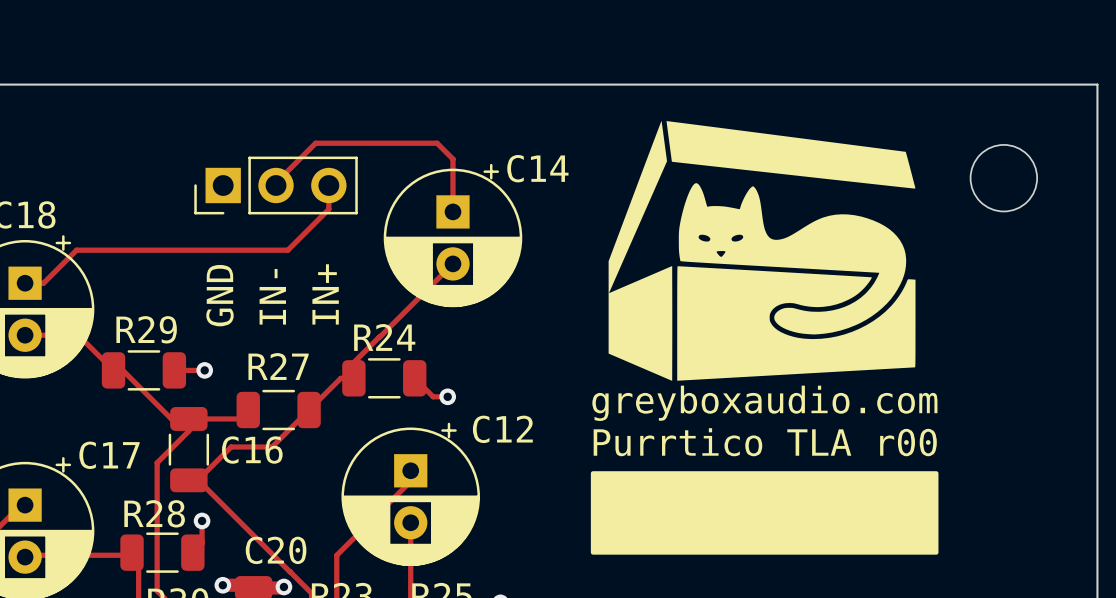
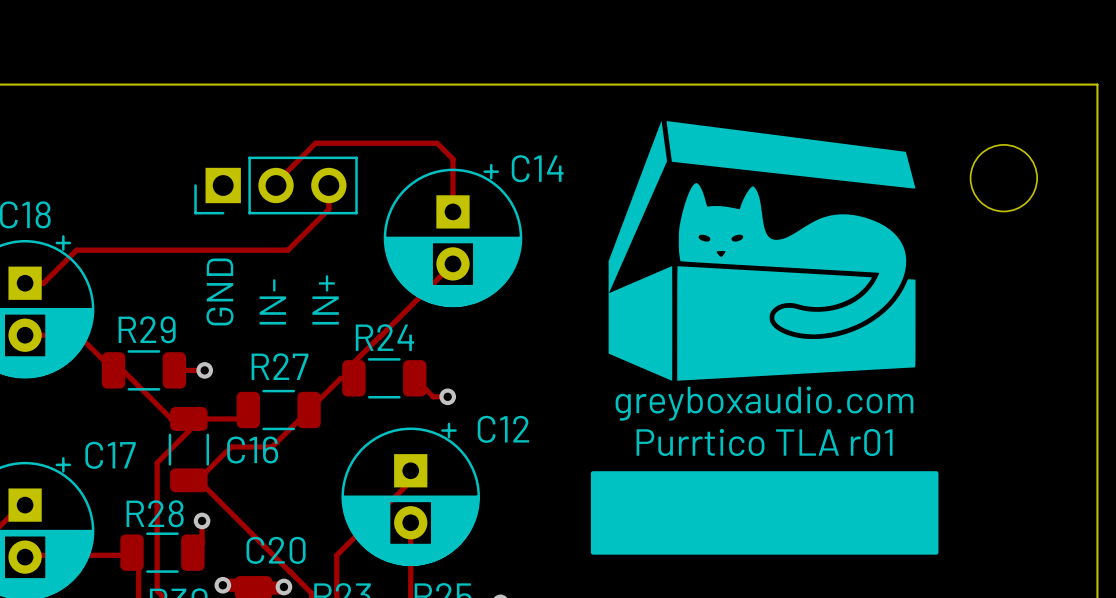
text: Purrtico TLA r00 (765, 442) -> Purrtico TLA r01 (764, 442)

